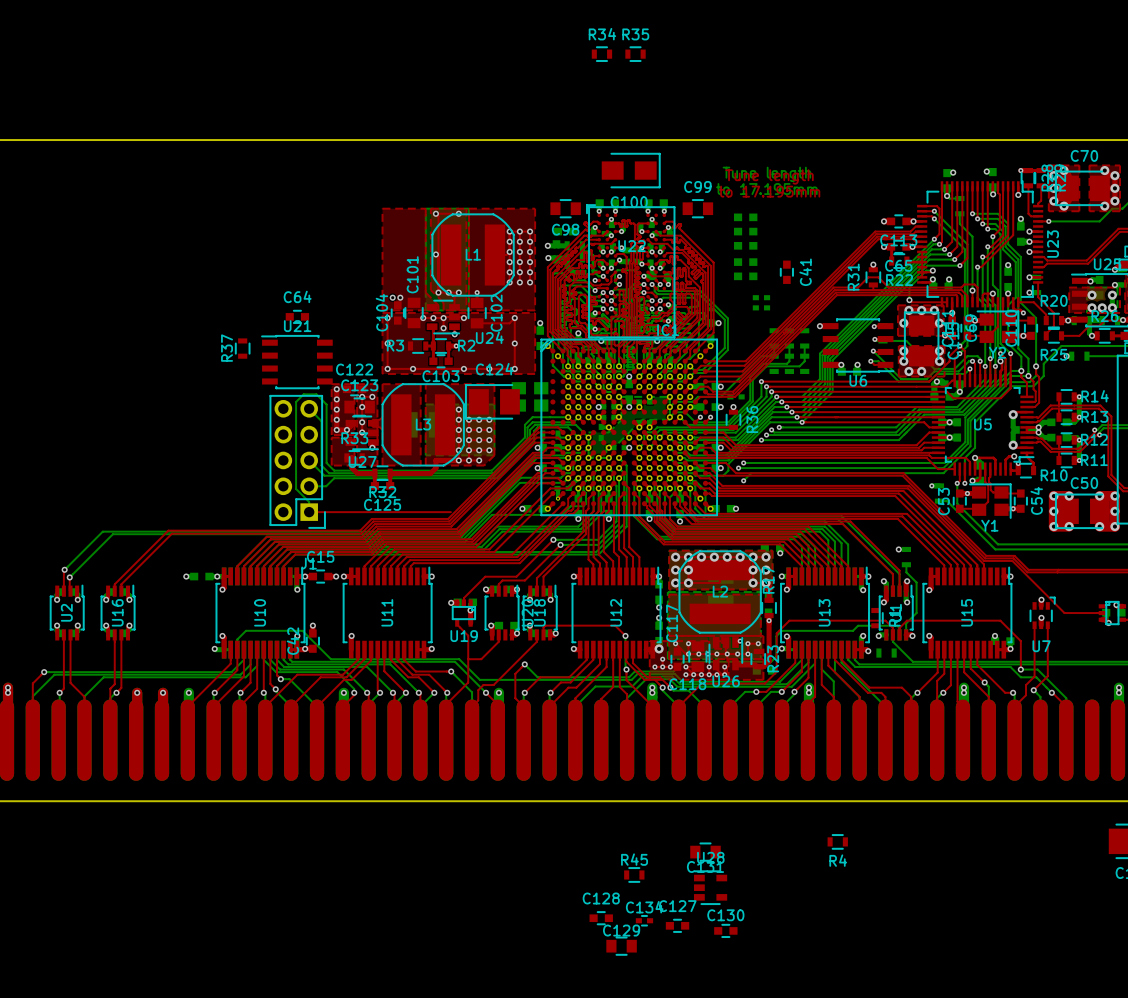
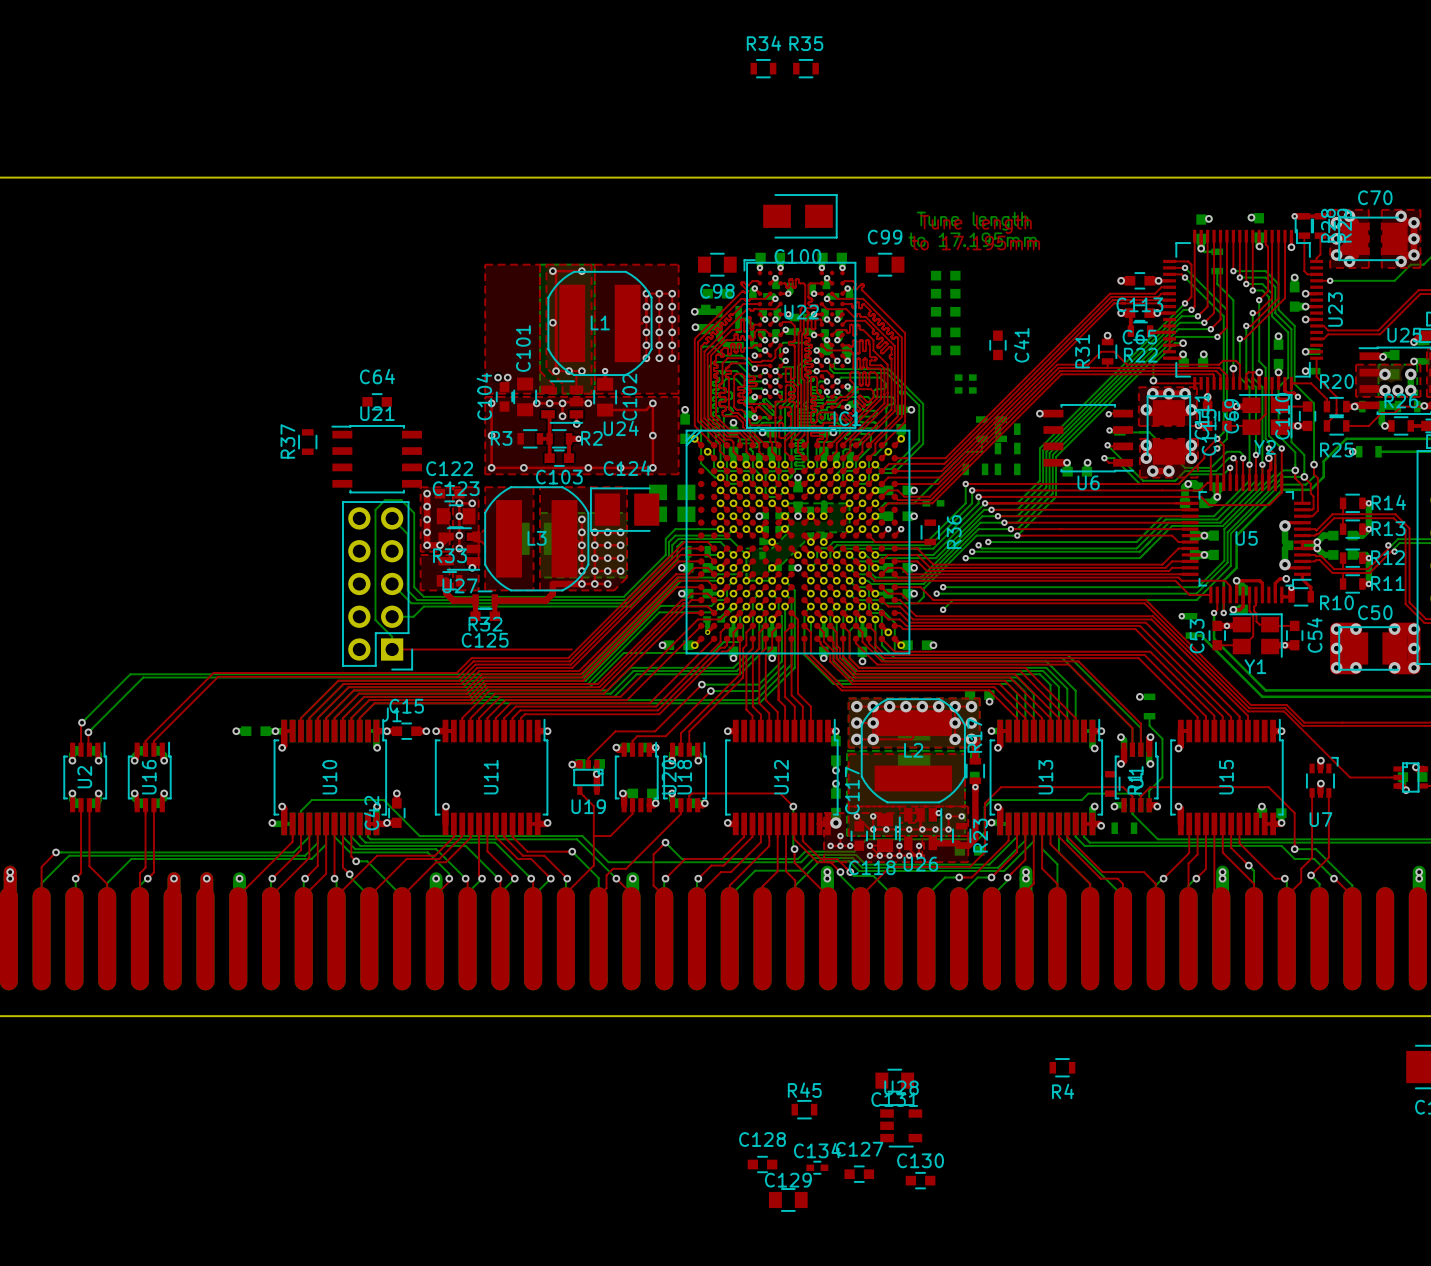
IC1 footprint: [540, 338, 718, 517] -> [685, 429, 911, 655]
part: none -> (1007, 429)
part: (804, 338) -> none
bottom track: (789, 346) (789, 361) (786, 363) (763, 363) (750, 377) (750, 400) (728, 422) (695, 422) (685, 412) (674, 412) (669, 417) -> none
bottom track: (804, 346) (804, 361) (799, 366) (766, 366) (752, 380) (752, 401) (729, 424) (687, 424) (680, 417) -> none
part: none -> (1007, 448)
part rotation: 0° (774, 363) -> 90° clockwise (975, 469)
part: (789, 363) -> none
part: (804, 363) -> none
part: none -> (1007, 469)
bottom track: (692, 401) (675, 401) (669, 407) -> none
via: (733, 407) -> none

